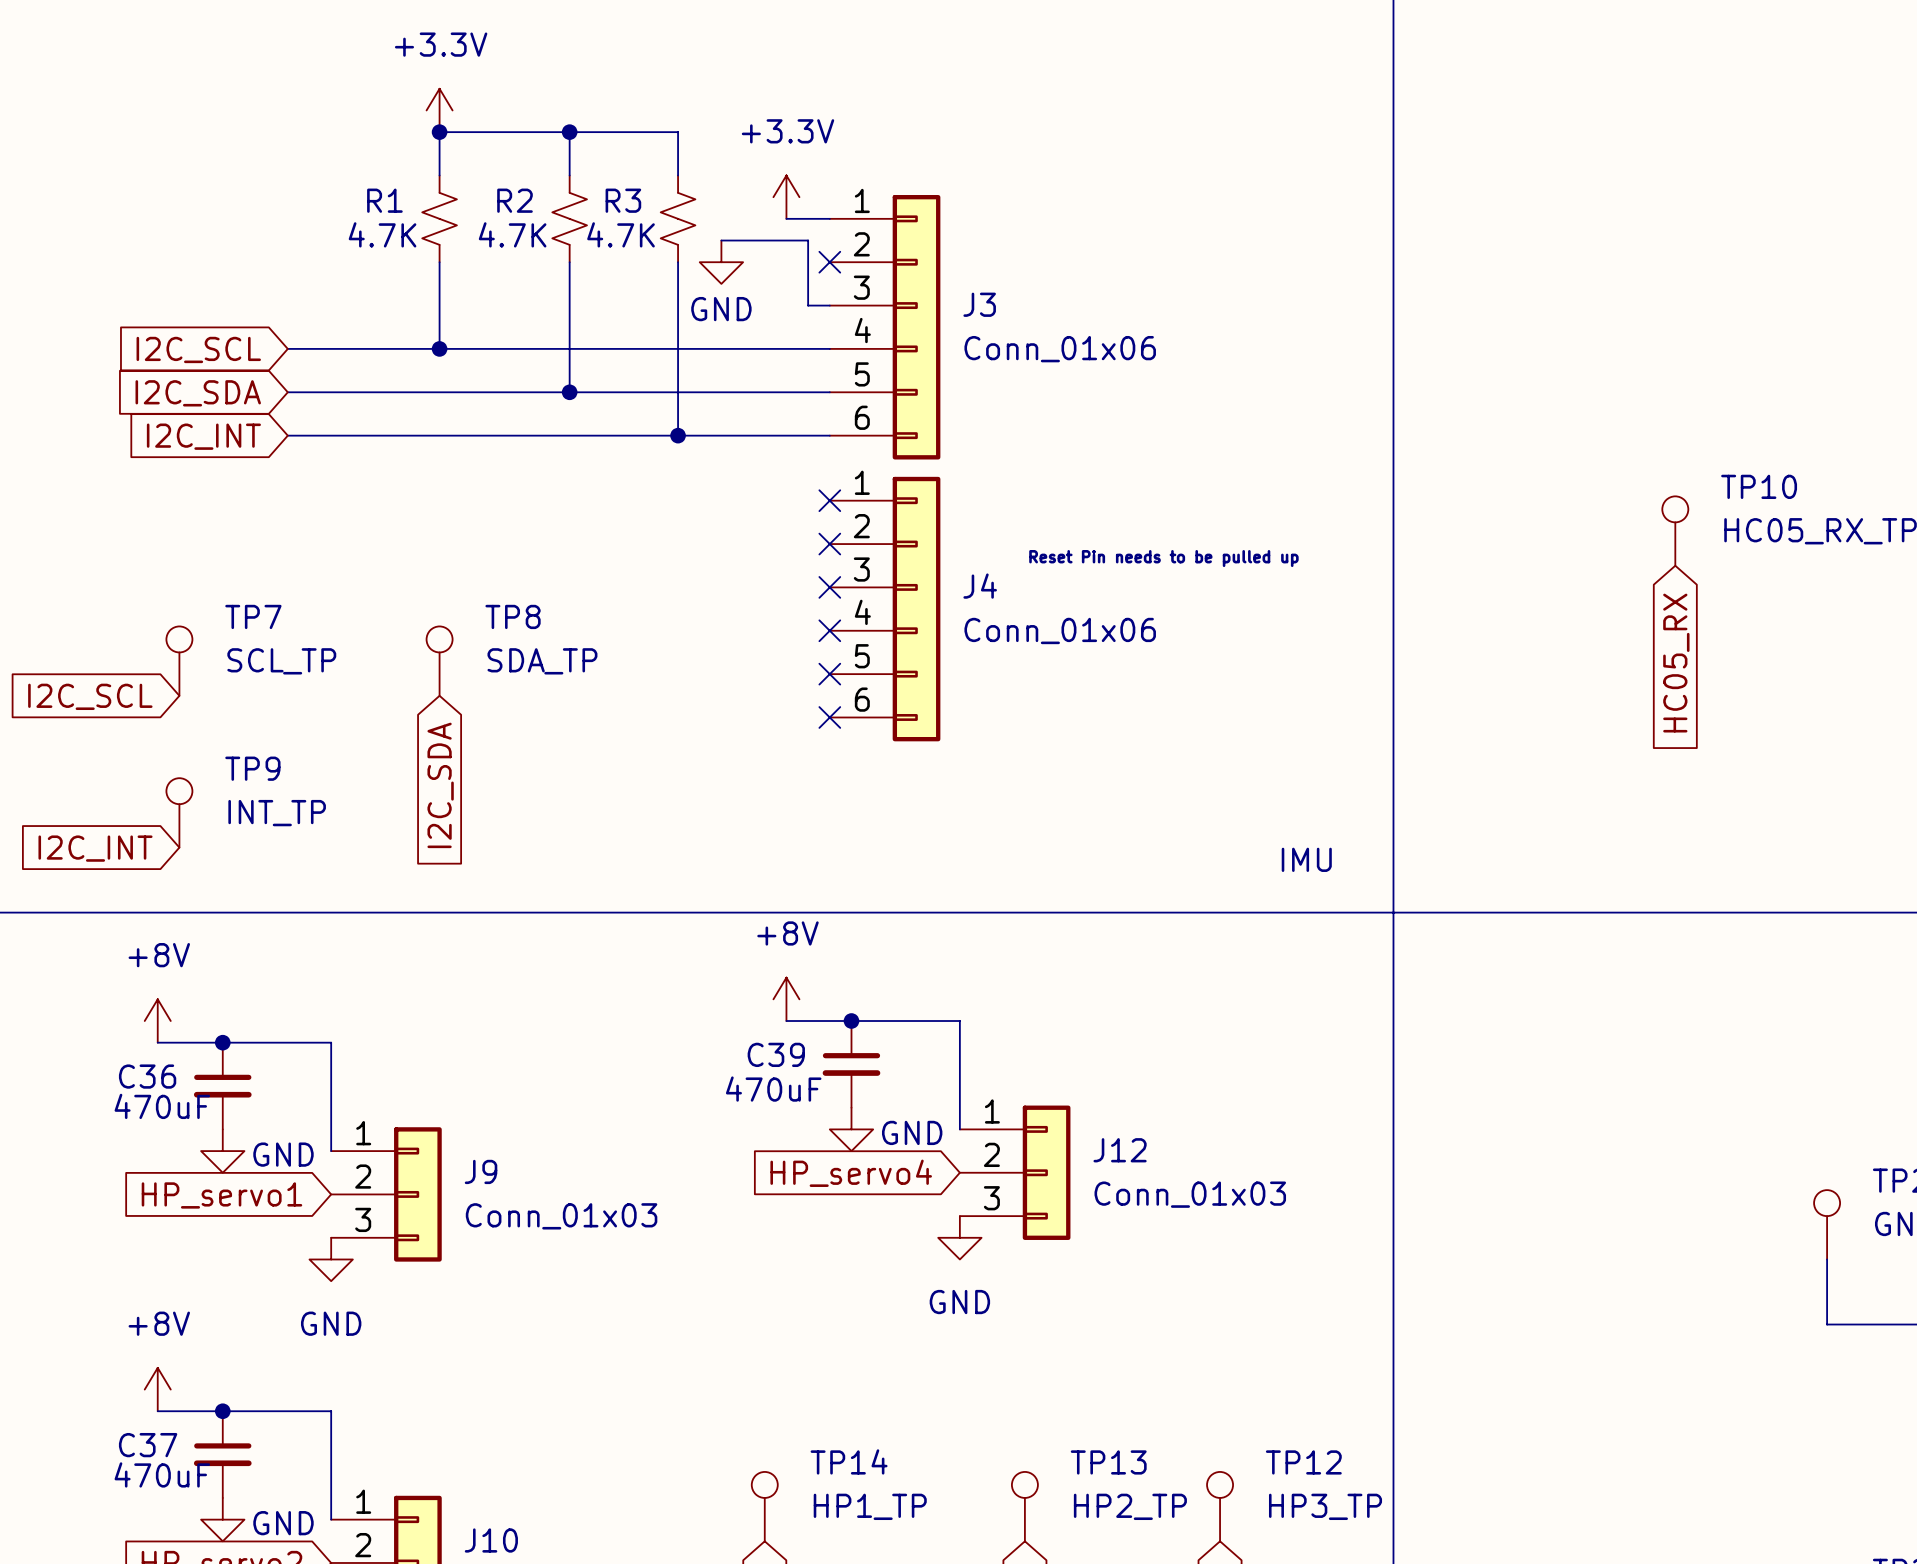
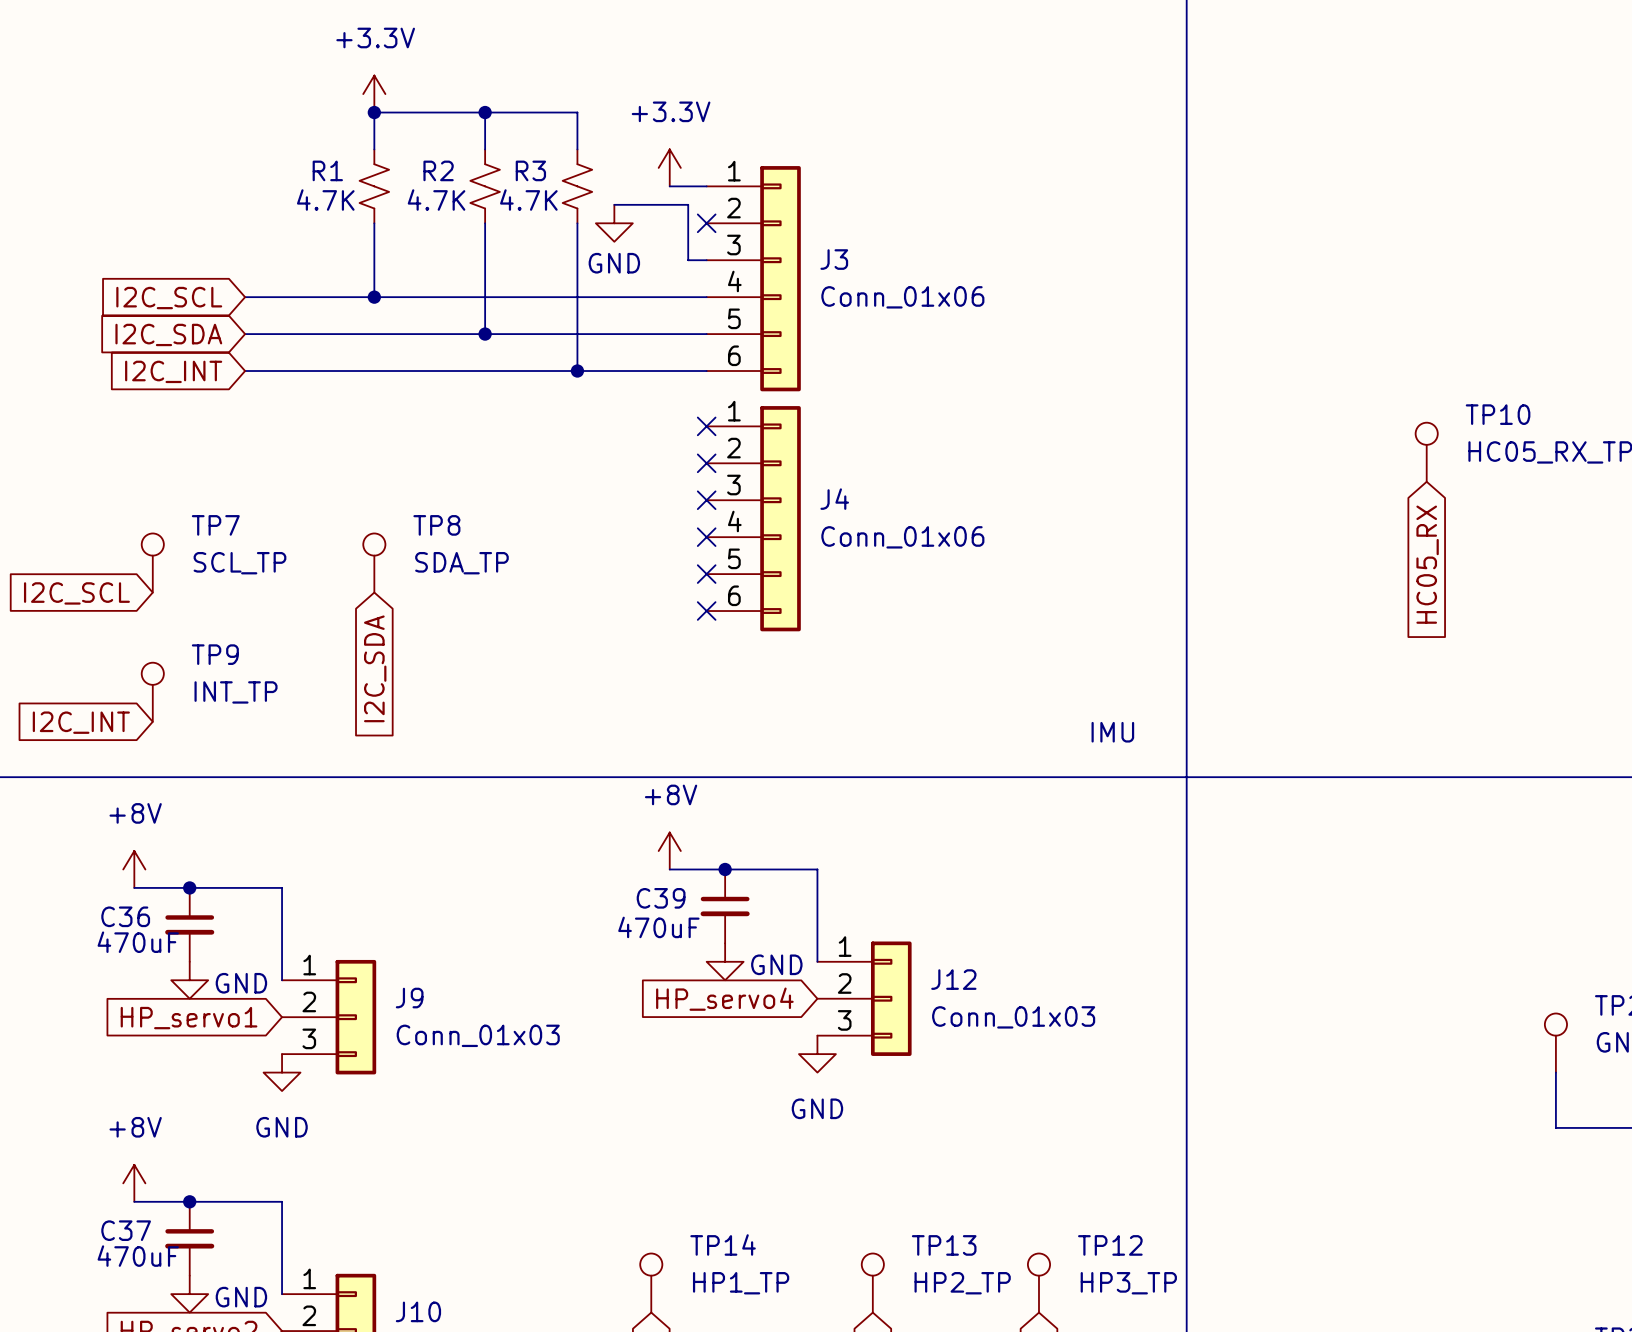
text: Reset Pin needs to be pulled up (1163, 558) -> none

